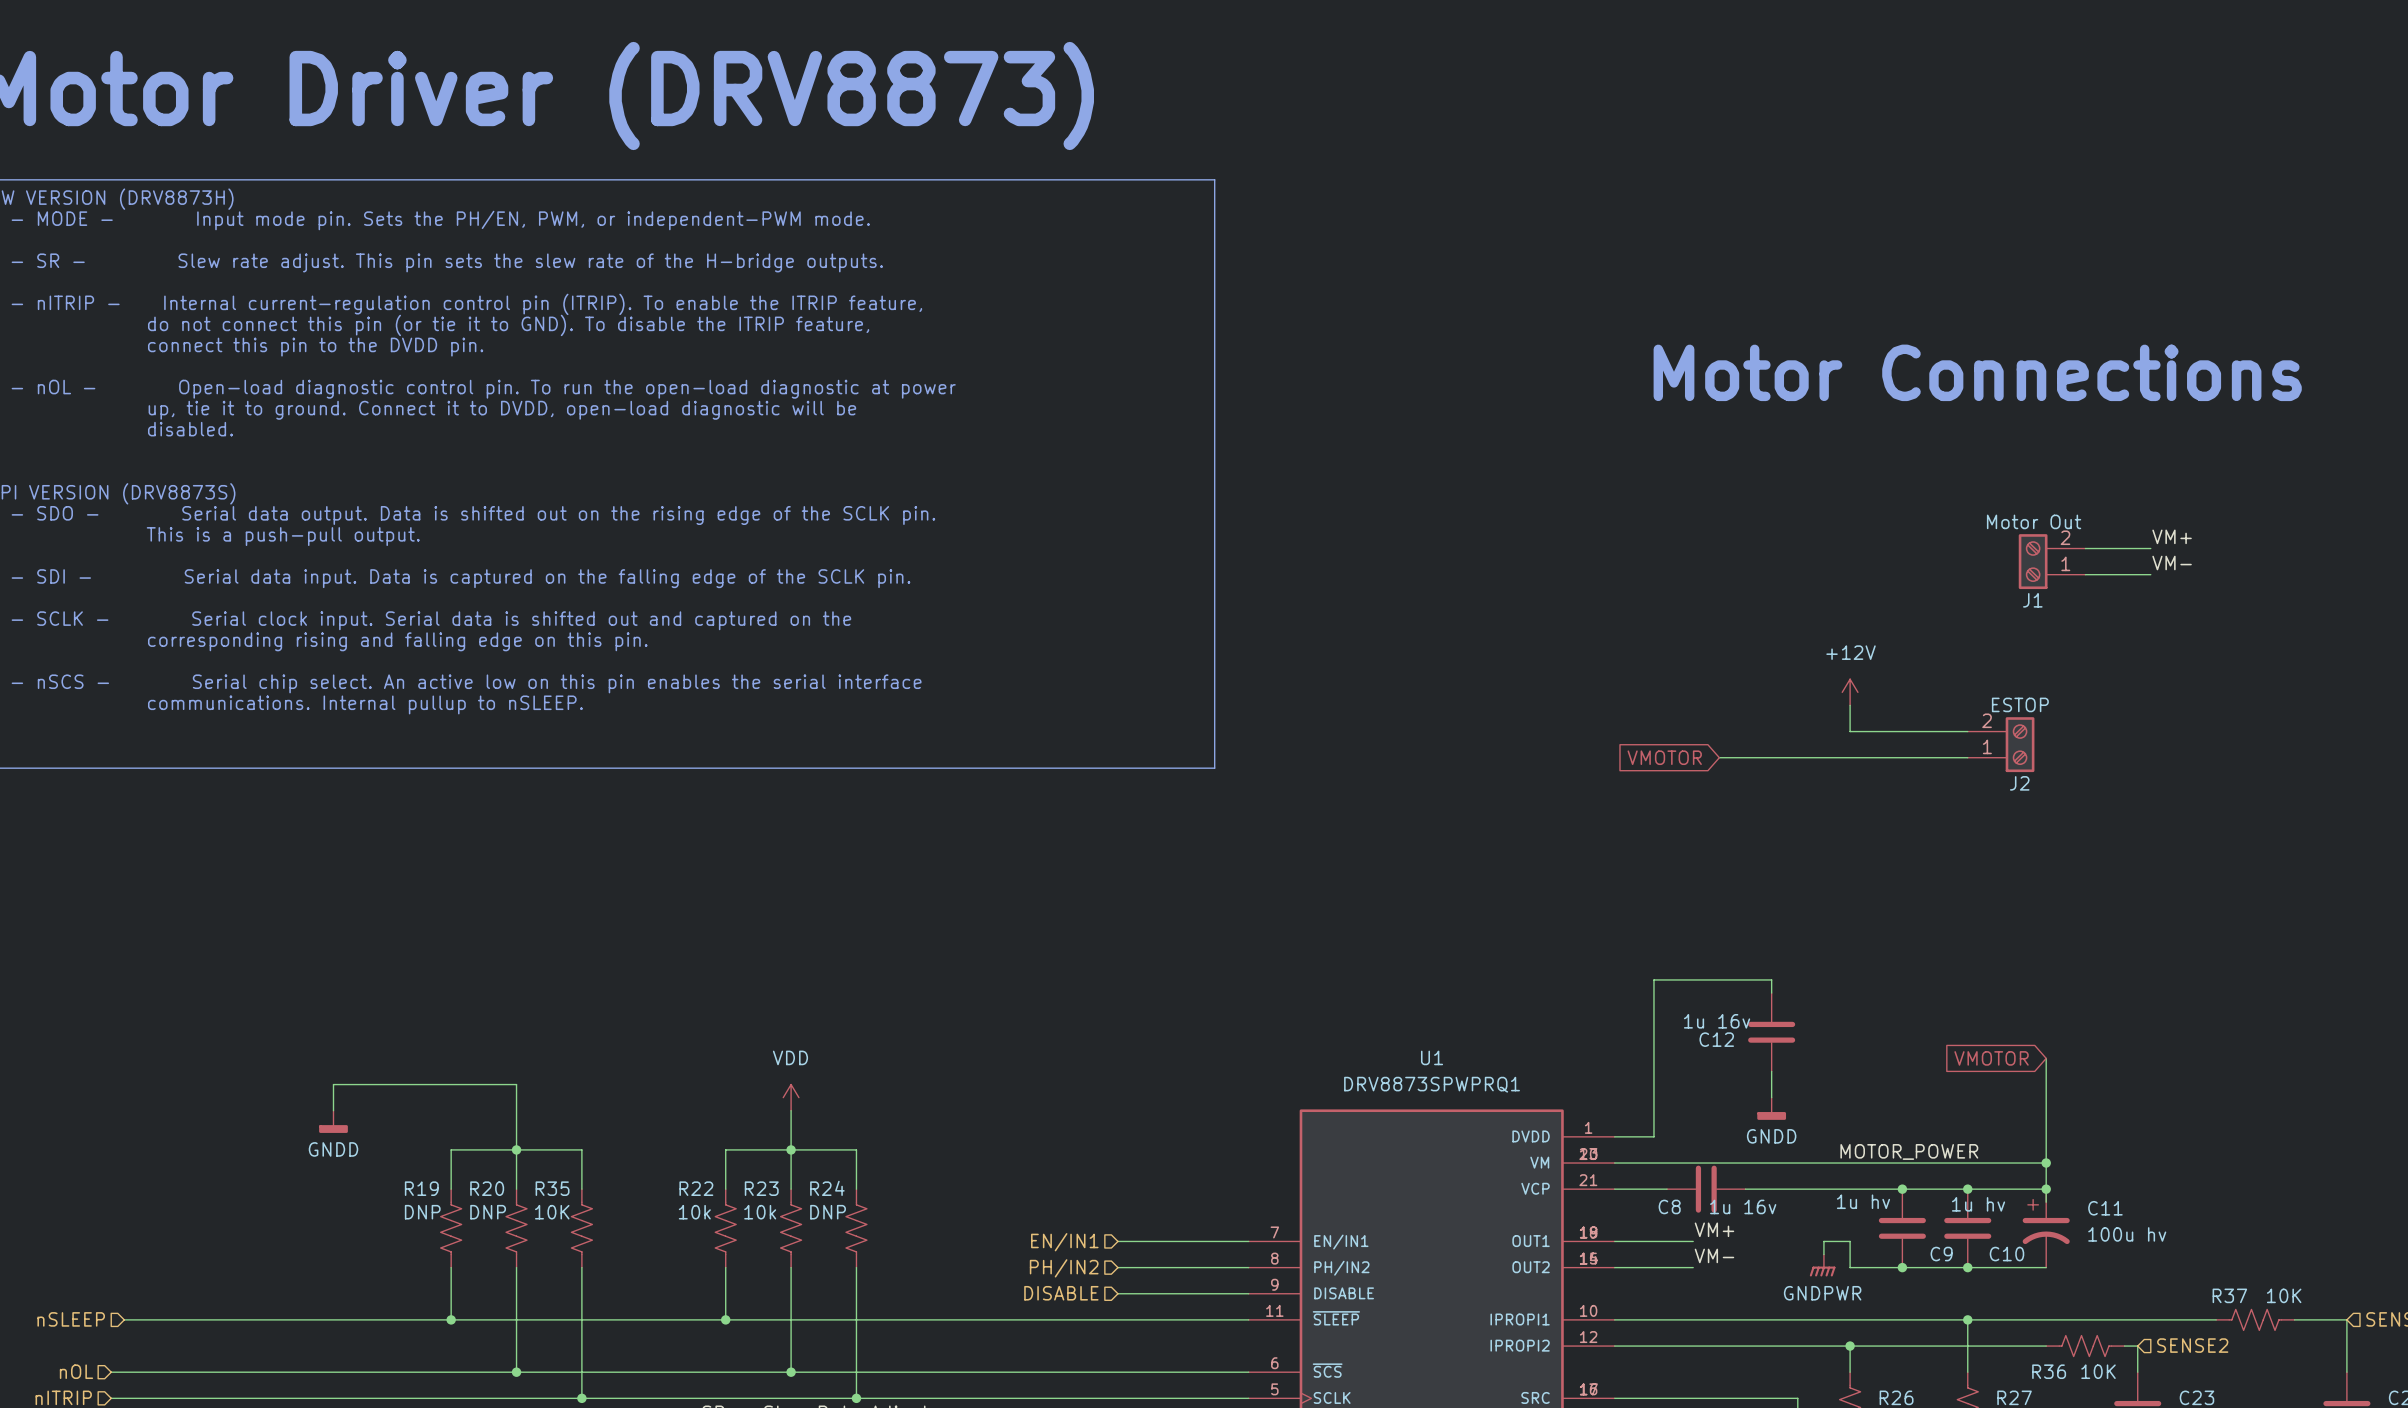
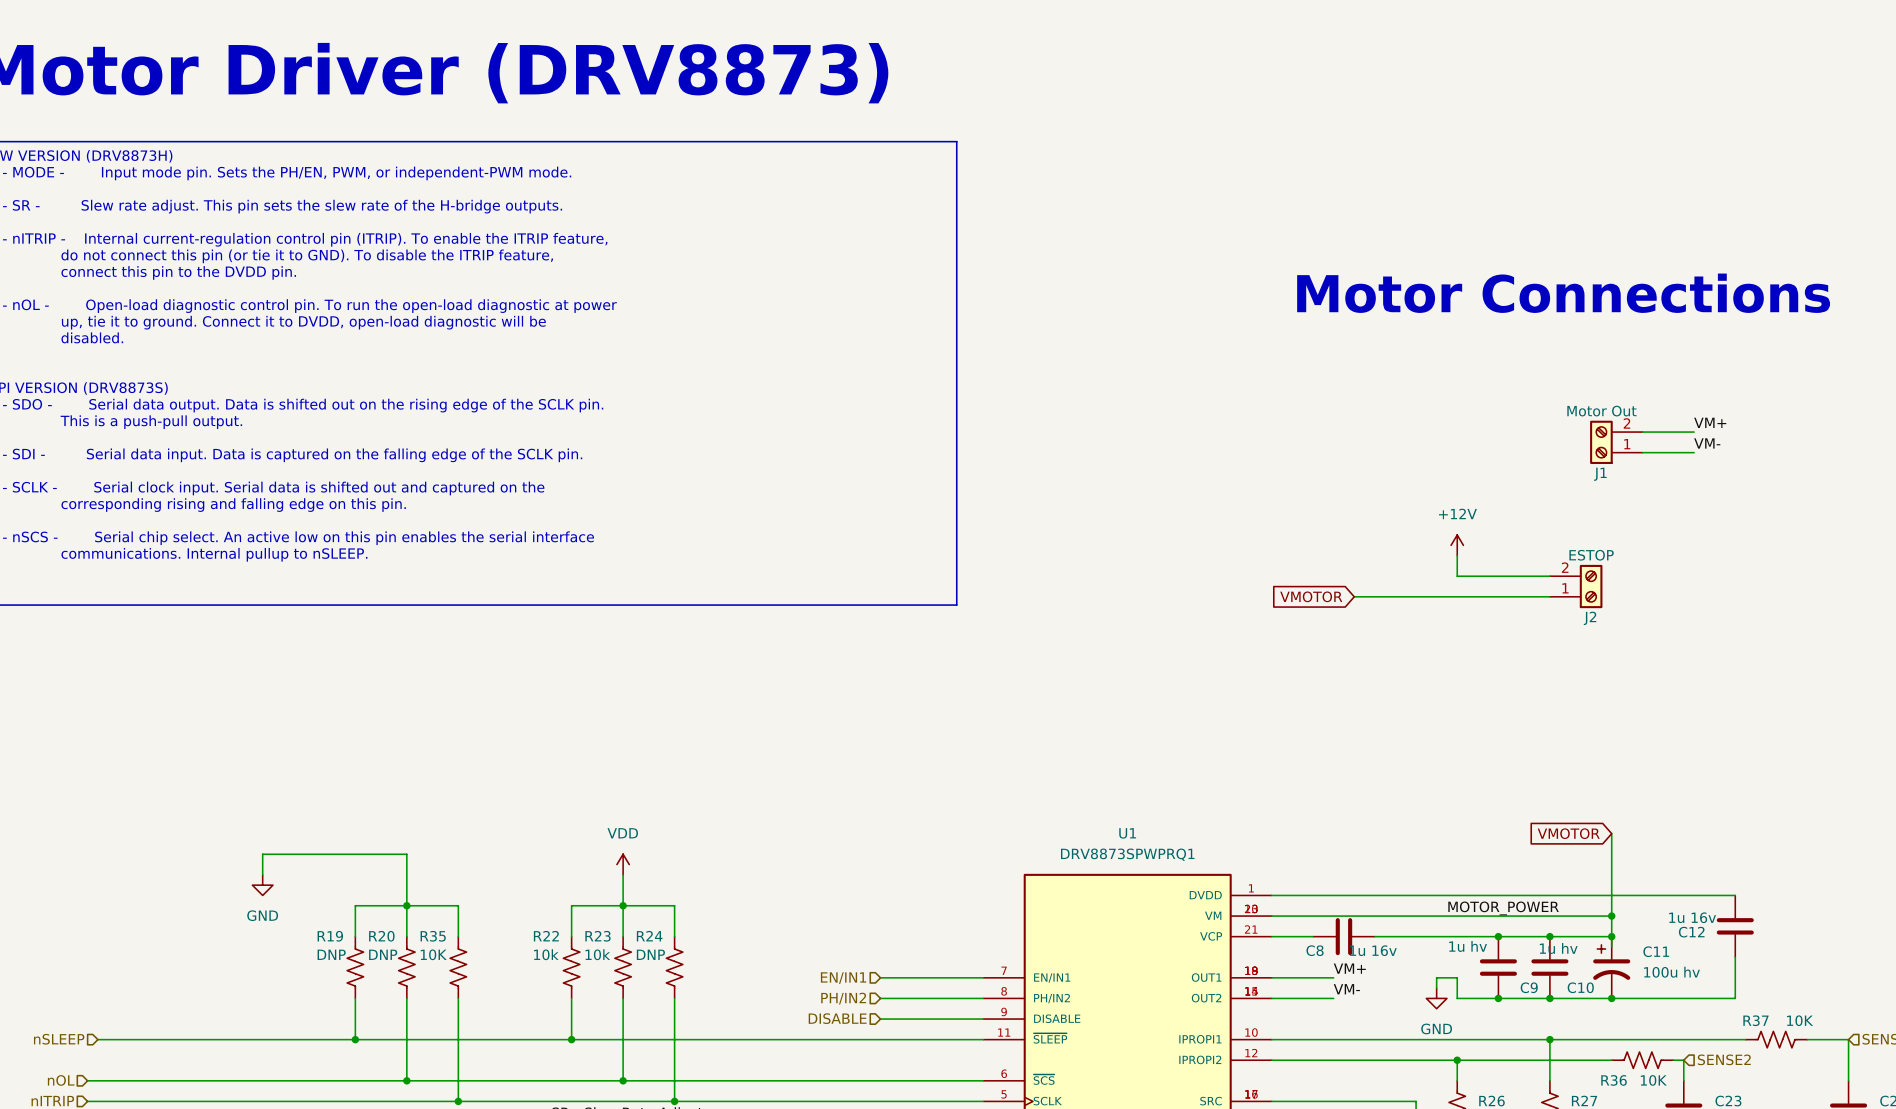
wire: (1771, 993) (1771, 979) (1653, 979) (1653, 1136) -> (1735, 895) (1302, 895)
C12 position: (1771, 1032) -> (1735, 926)
wire: (1771, 1071) (1771, 1097) -> none
power symbol: GNDD (1771, 1108) -> none
power symbol: GNDD (333, 1121) -> GND (262, 885)
wire: none -> (1735, 957) (1735, 998) (1611, 998)
power symbol: GNDPWR (1822, 1265) -> GND (1436, 998)
junction: none -> (1611, 998)

